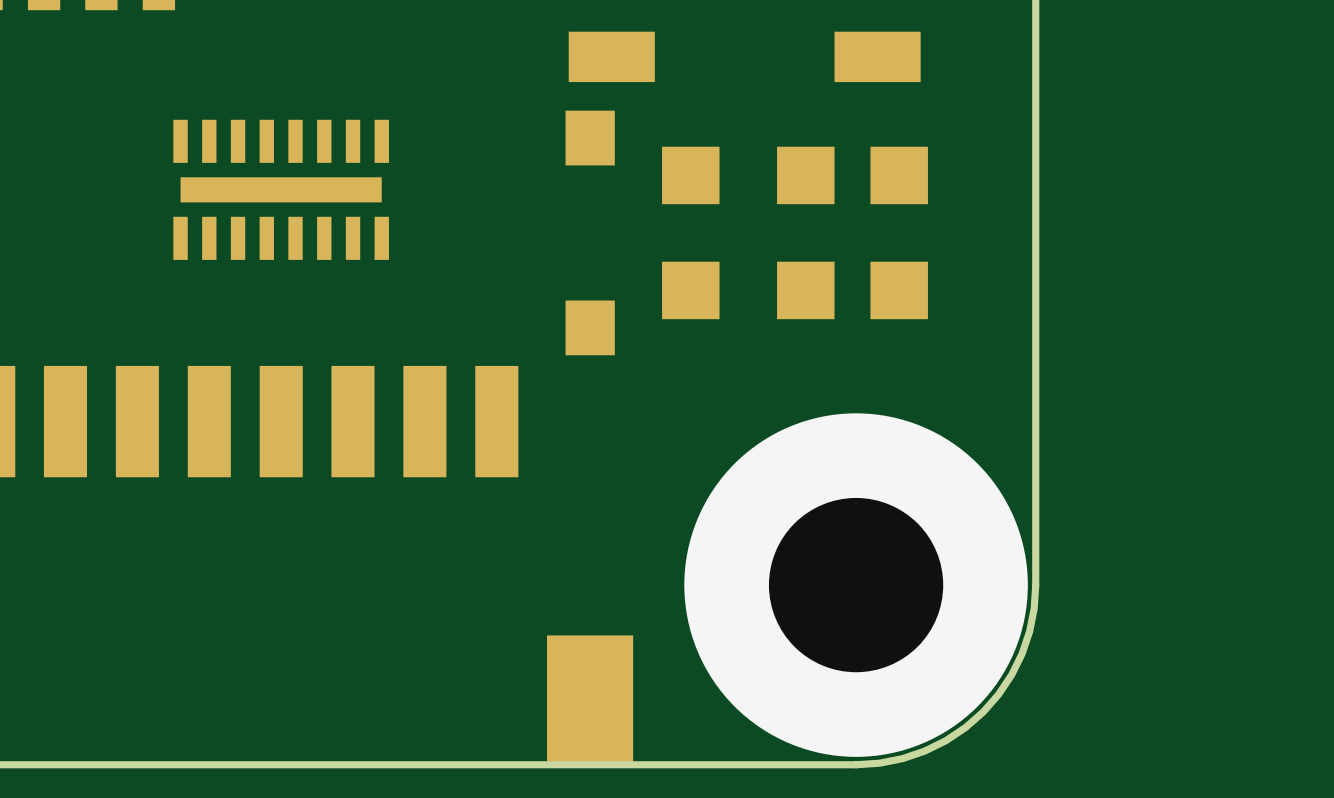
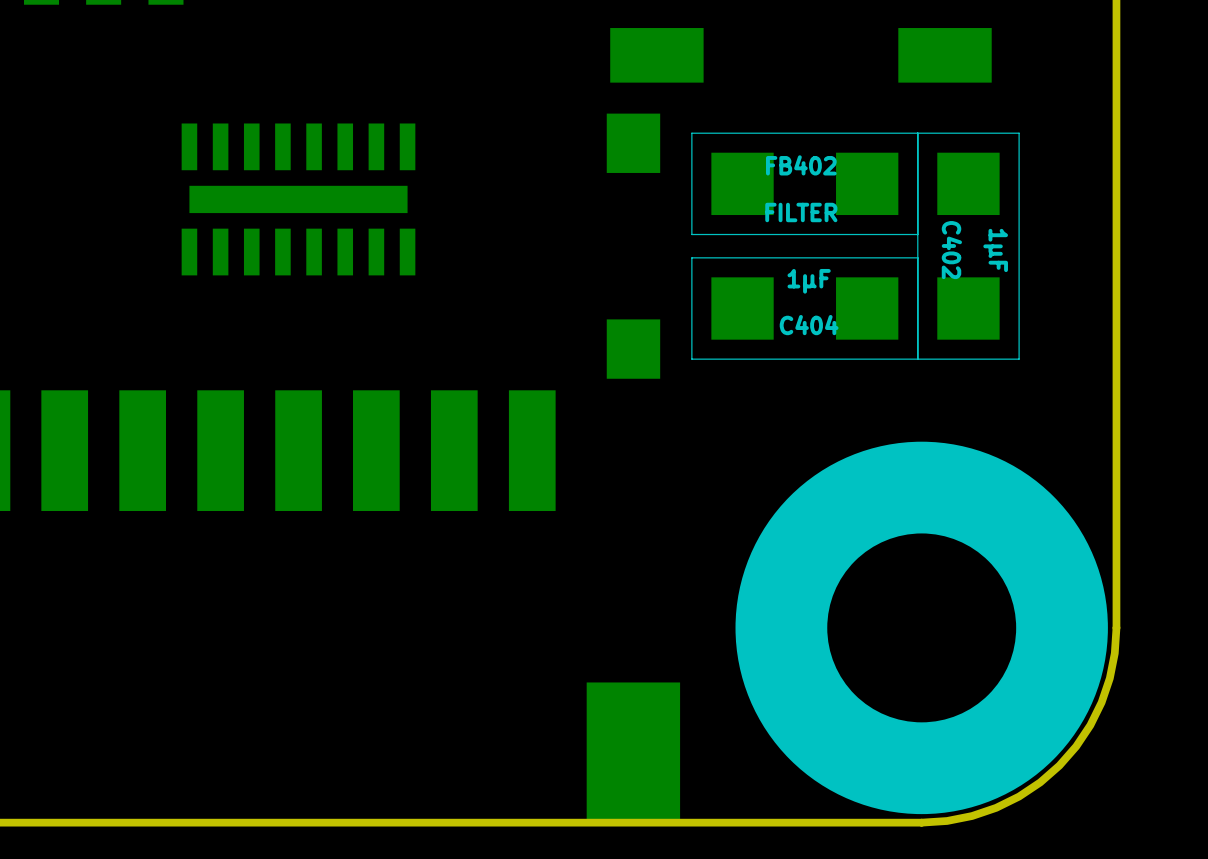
part: (748, 175) -> none
FB402: none -> FILTER (804, 183)
part: (899, 232) -> none
C402: none -> 1µF (968, 246)
part: (748, 290) -> none
C404: none -> 1µF (804, 308)

